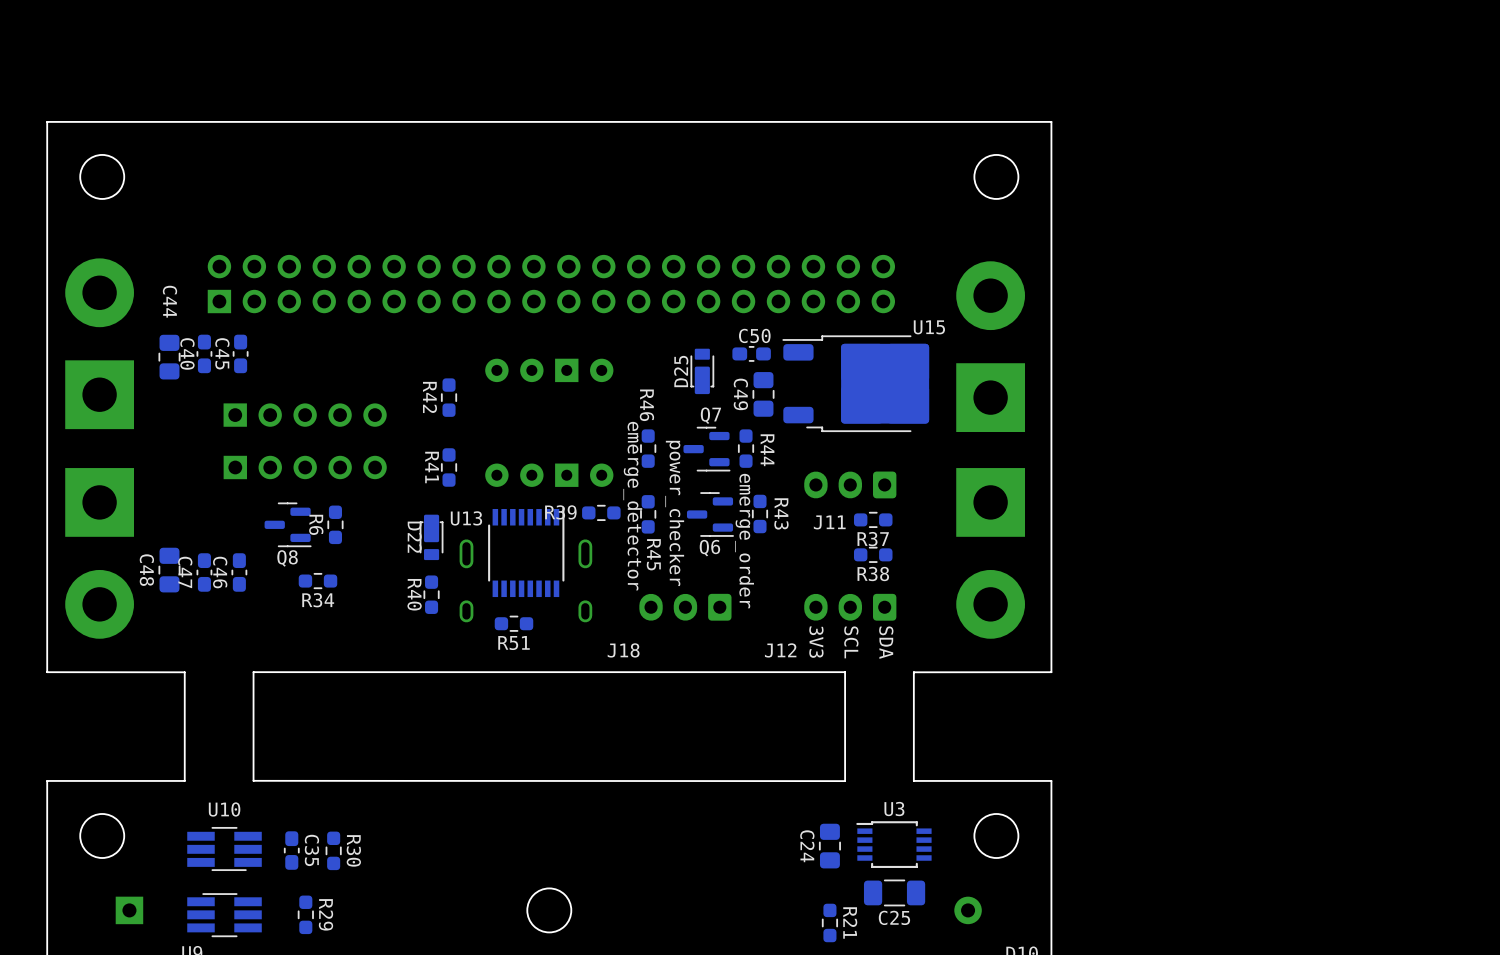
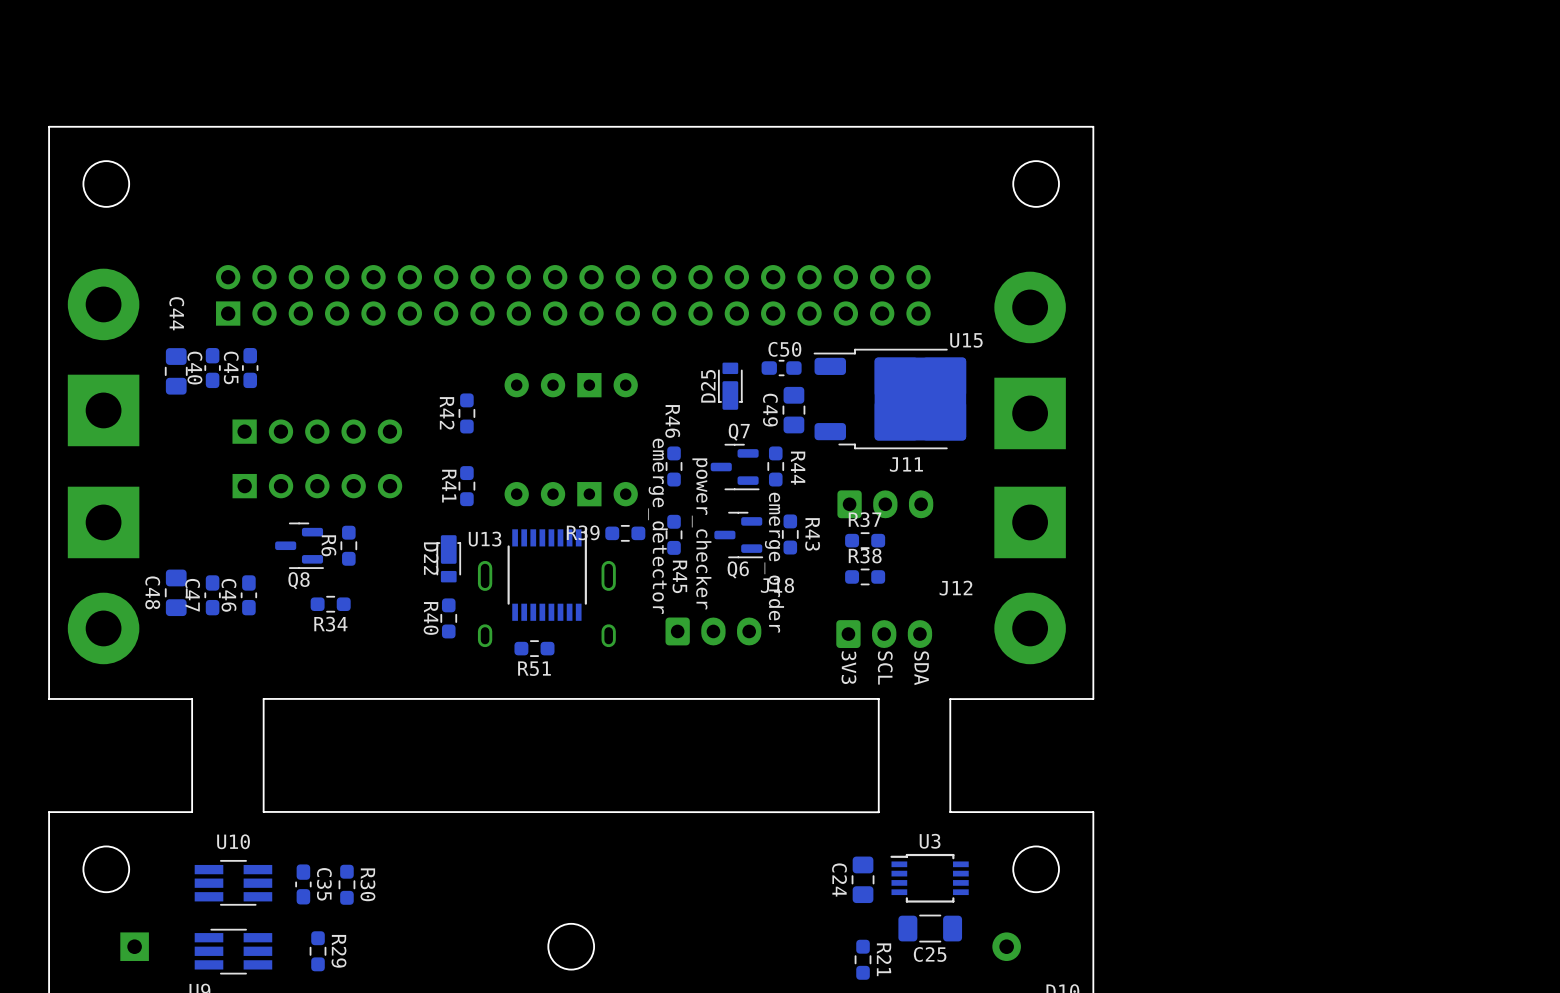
J11 rotation: 0° (850, 484) -> 180° (885, 504)
R37 position: (873, 519) -> (865, 540)
R37 name position: R37 (873, 539) -> R37 (865, 519)
R38 position: (873, 554) -> (865, 576)
R38 name position: R38 (873, 574) -> R38 (865, 555)
J18 rotation: 0° (685, 607) -> 180° (713, 631)
J12 rotation: 0° (850, 607) -> 180° (884, 634)

